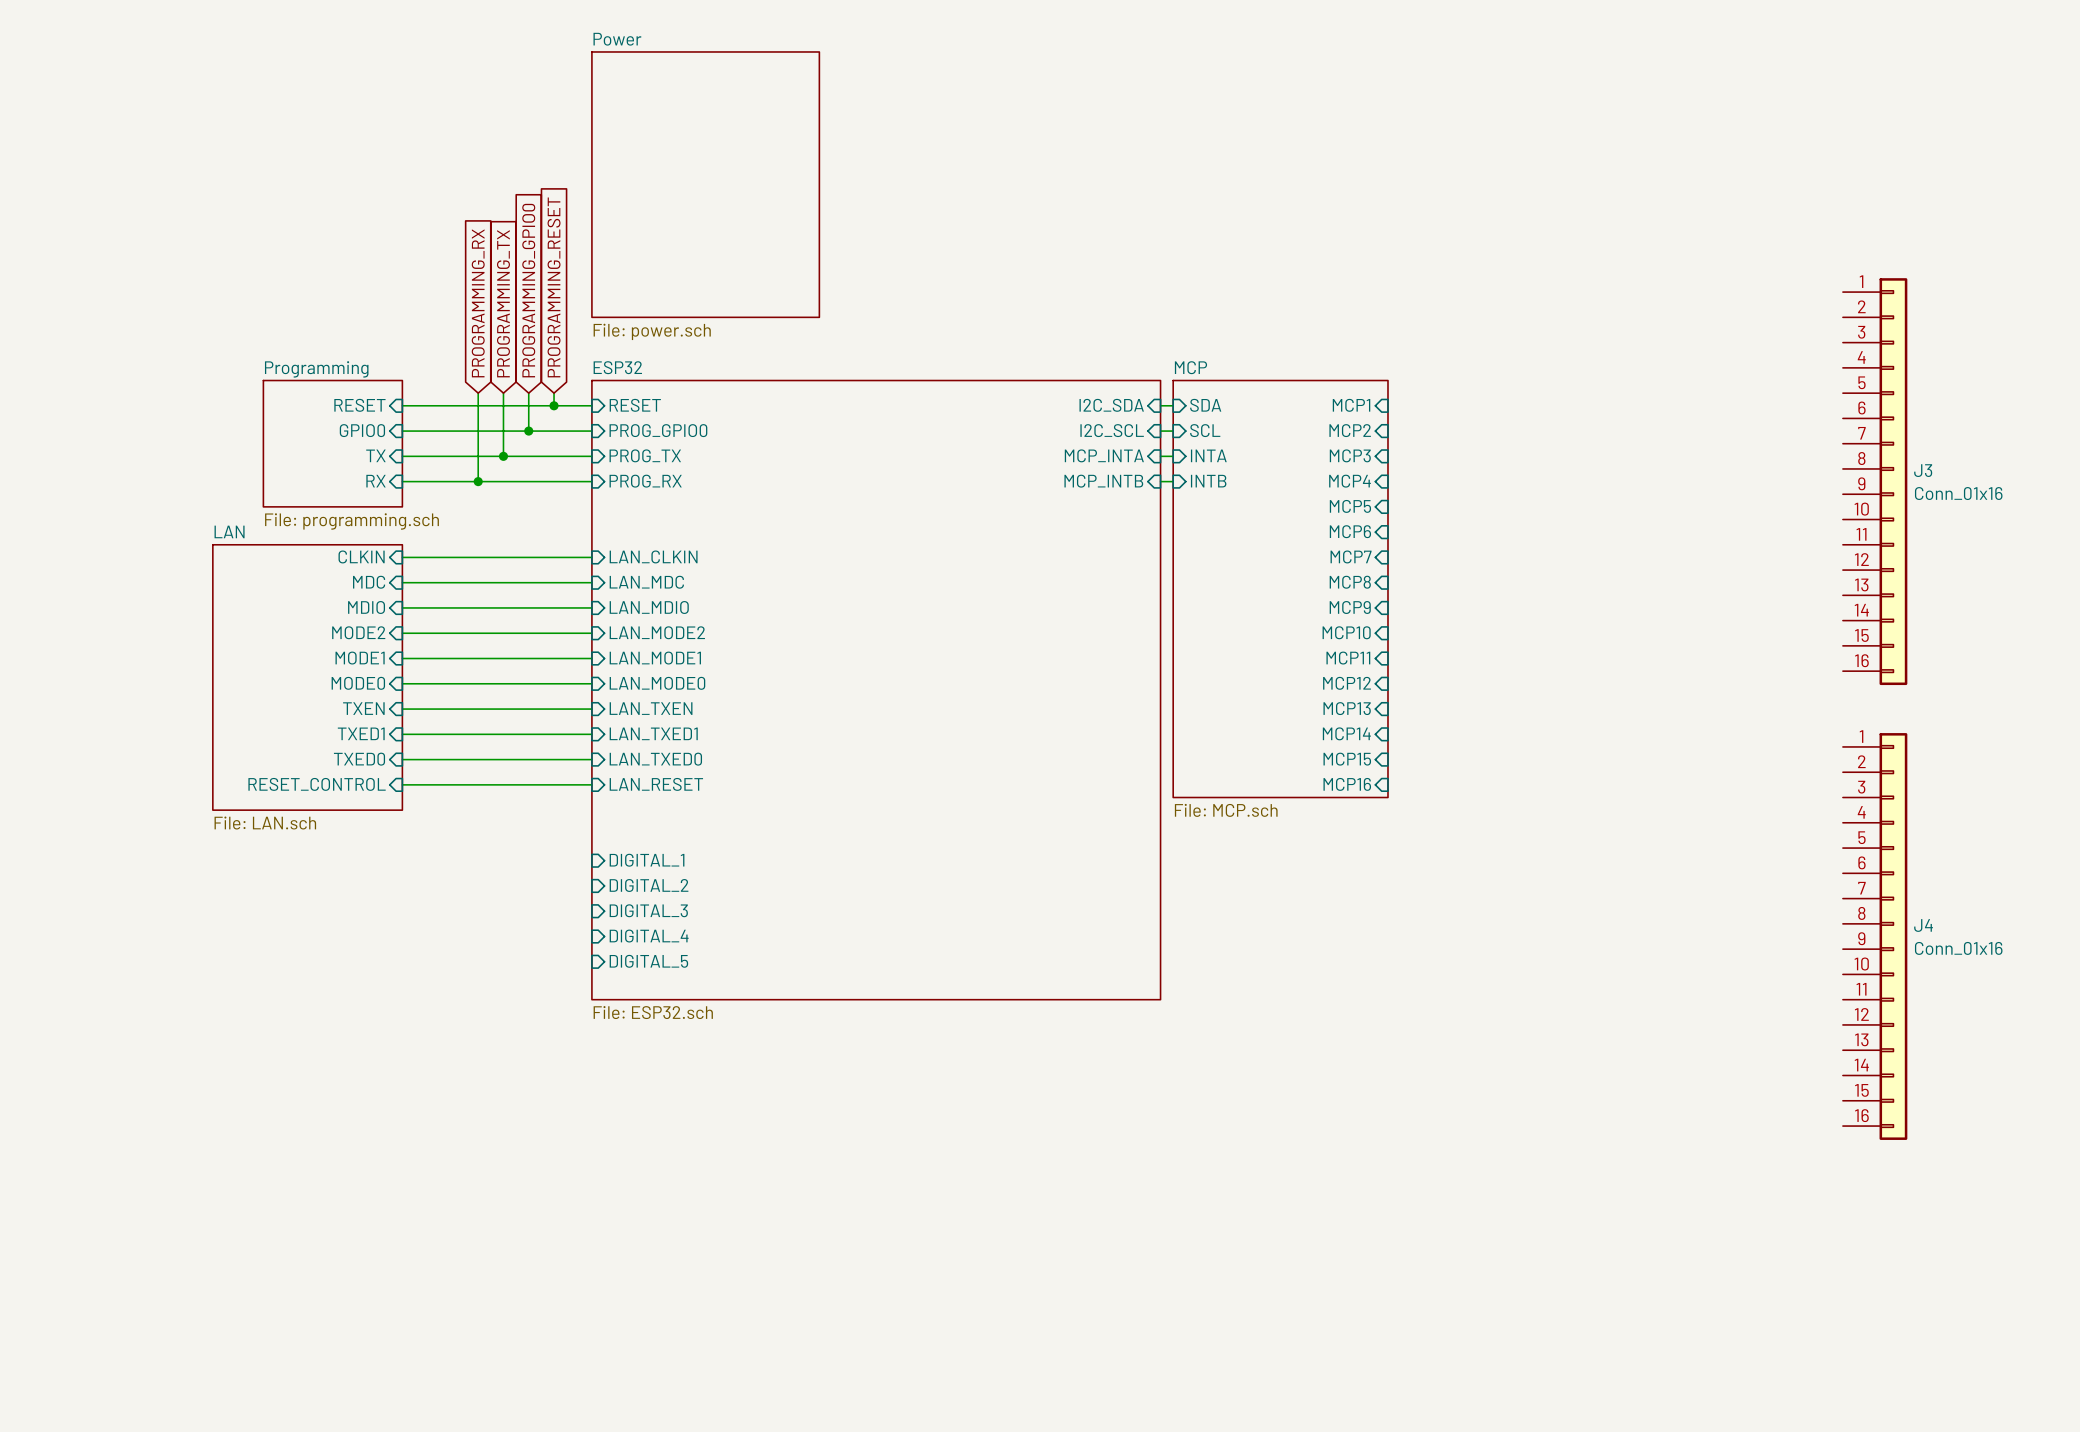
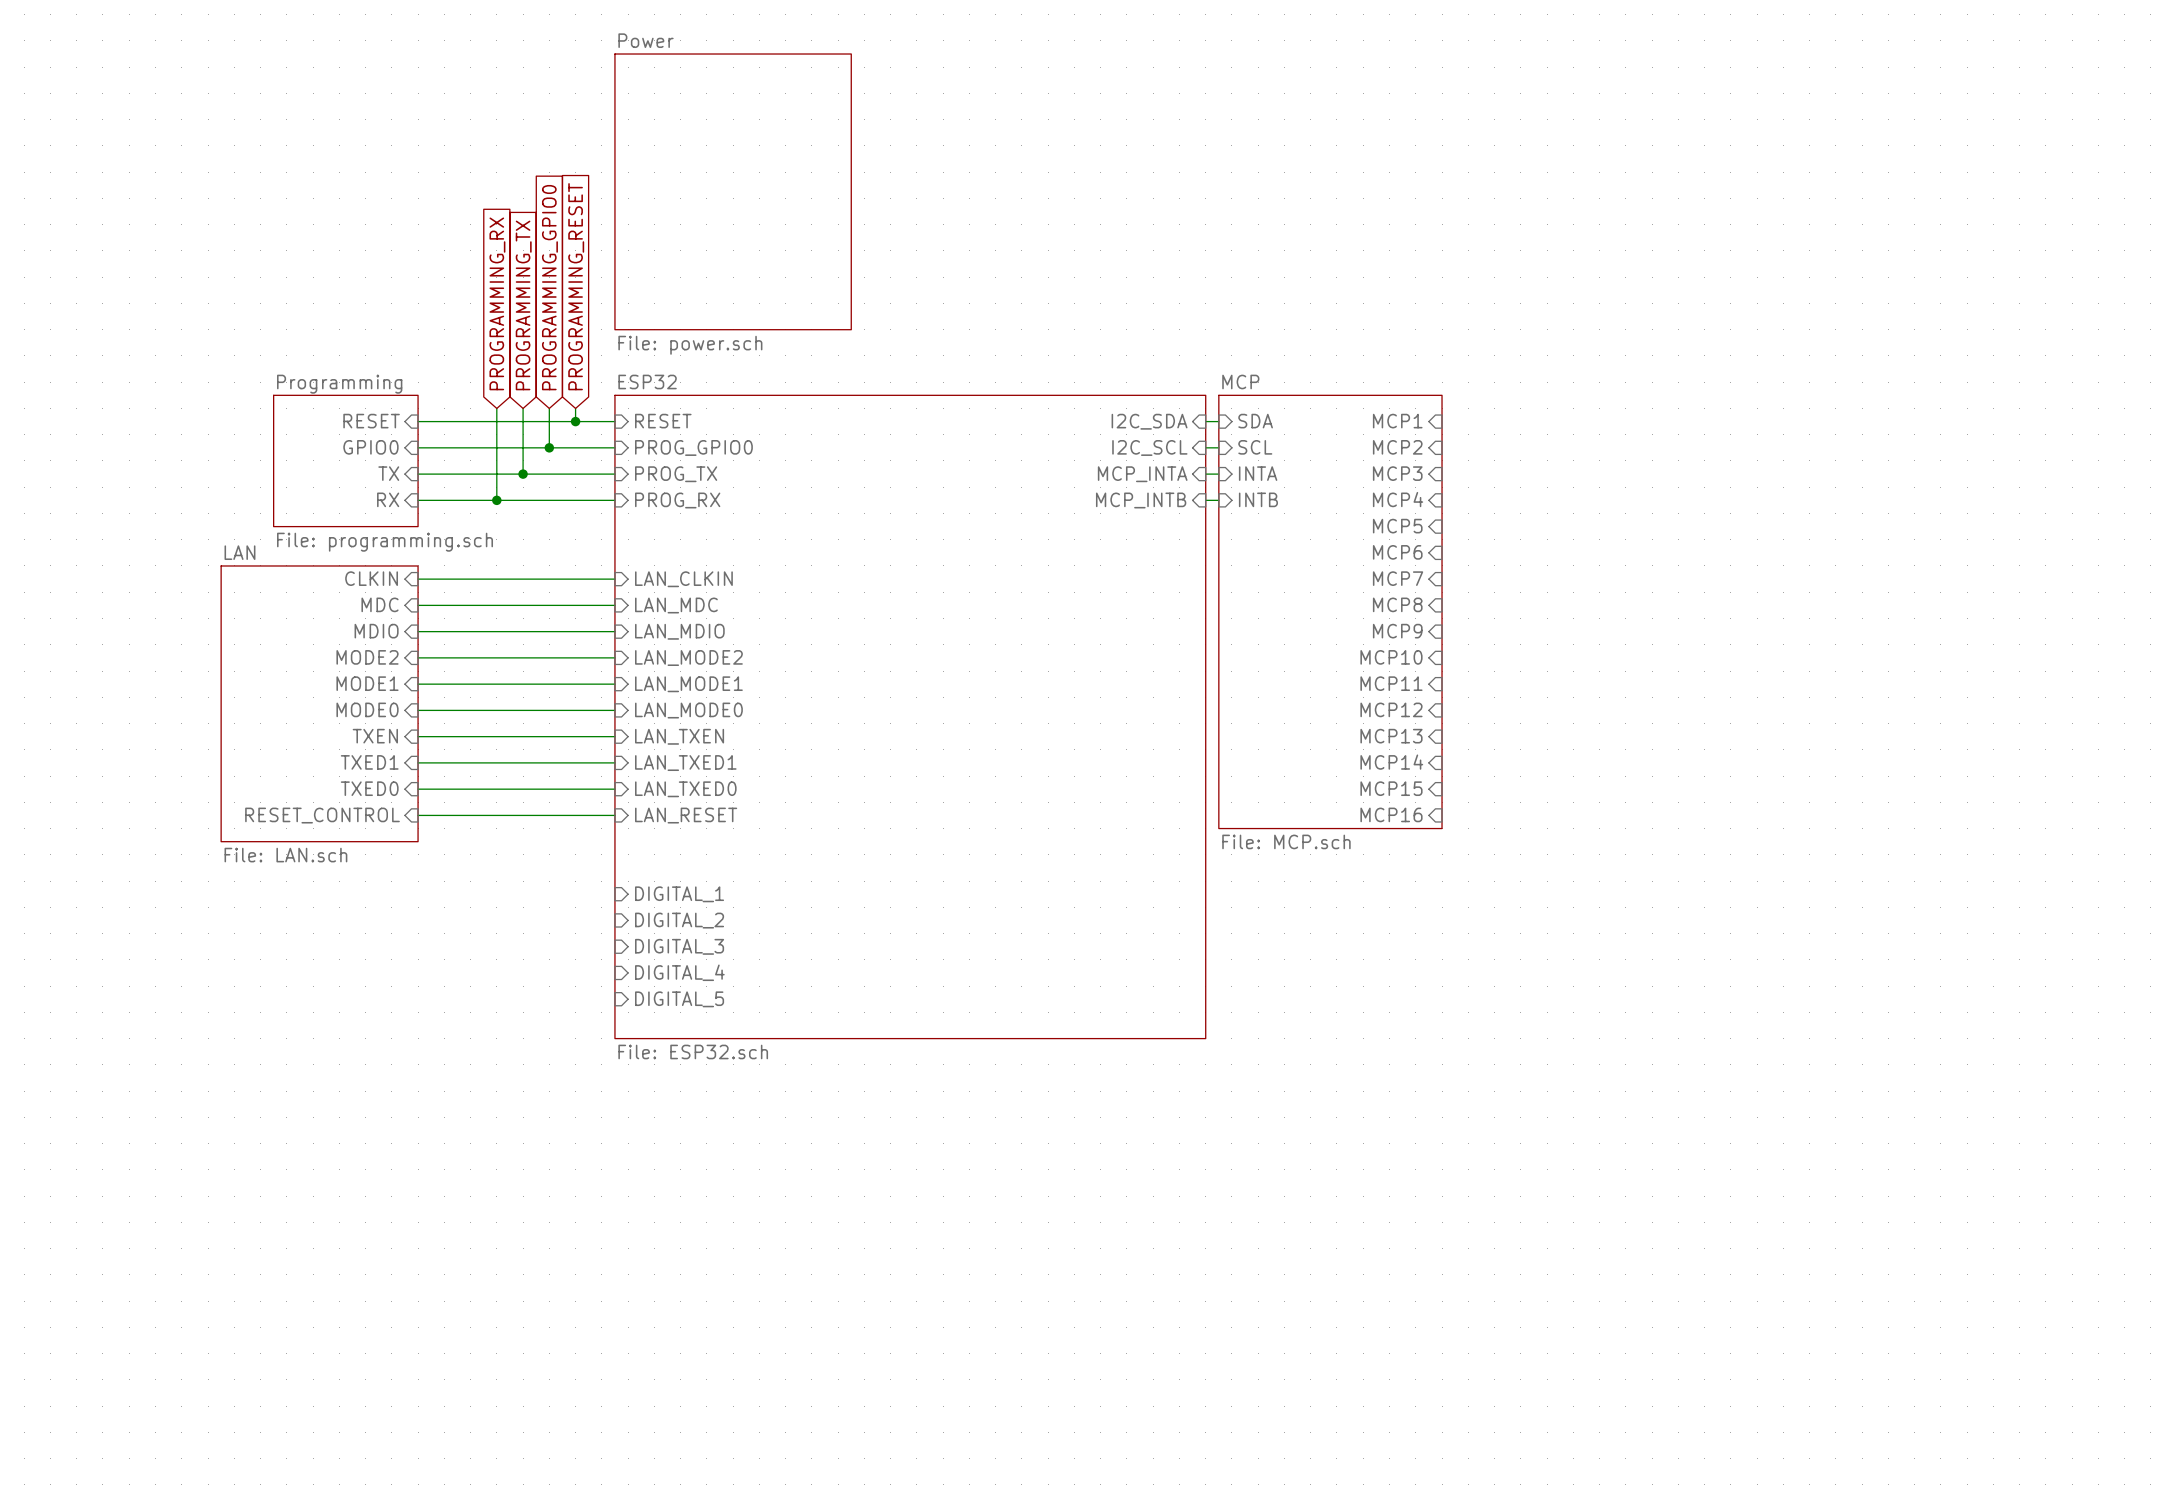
J3: Conn_01x16 (1875, 481) -> none
J4: Conn_01x16 (1875, 936) -> none

